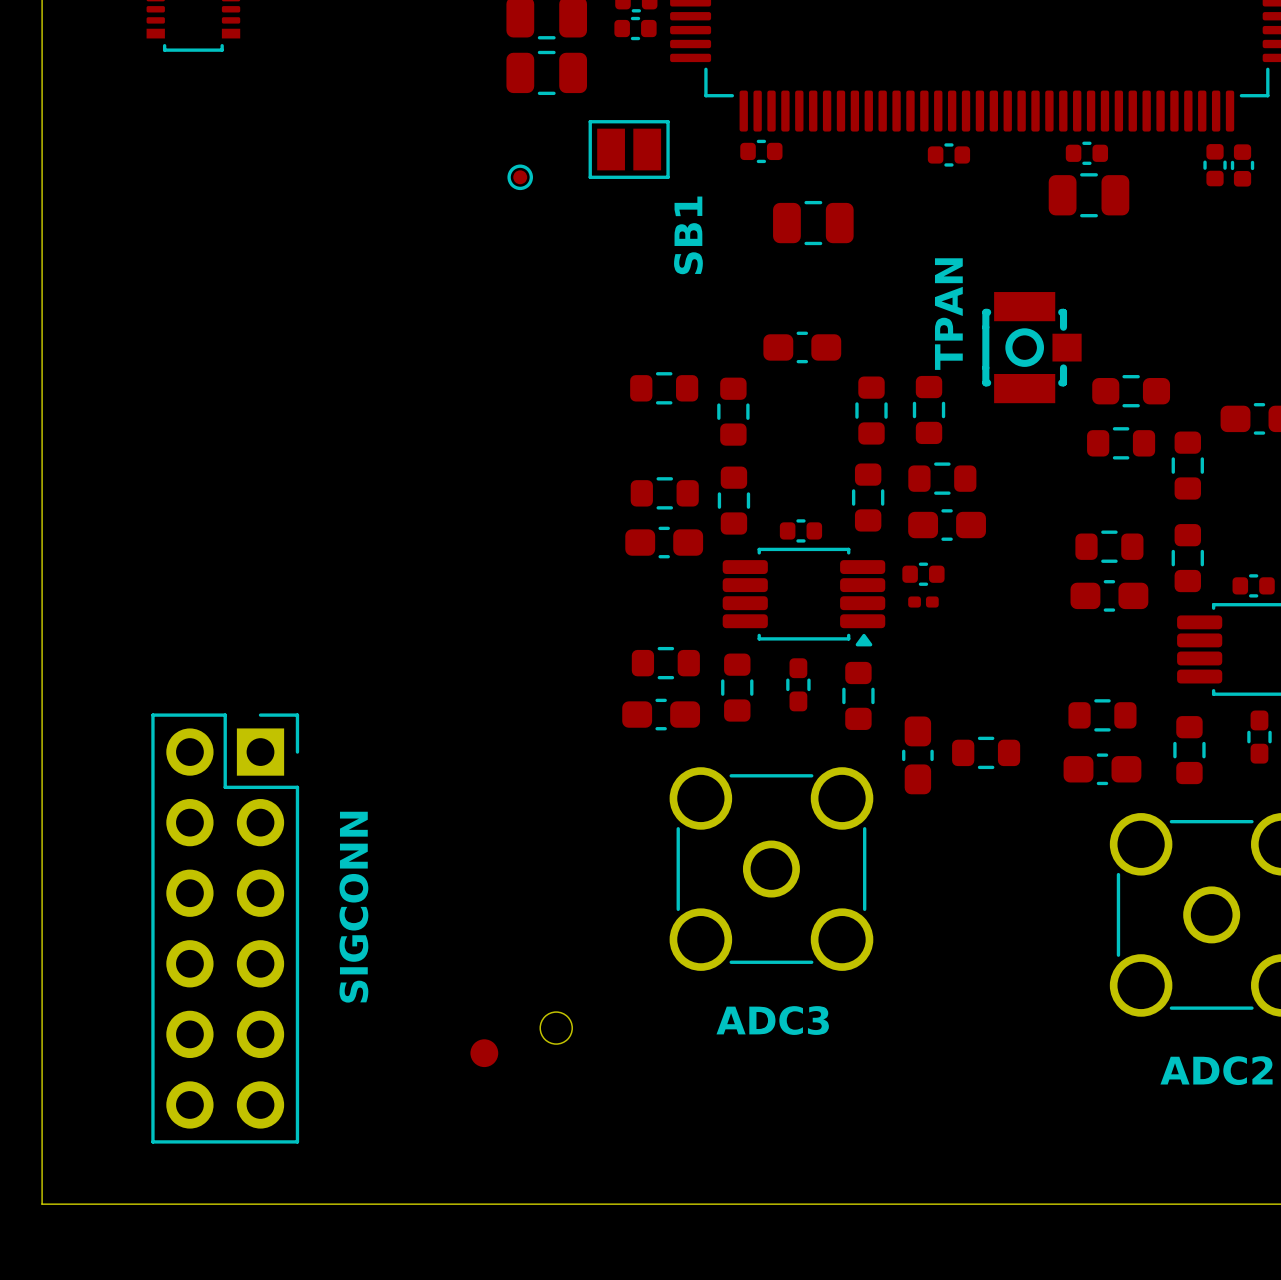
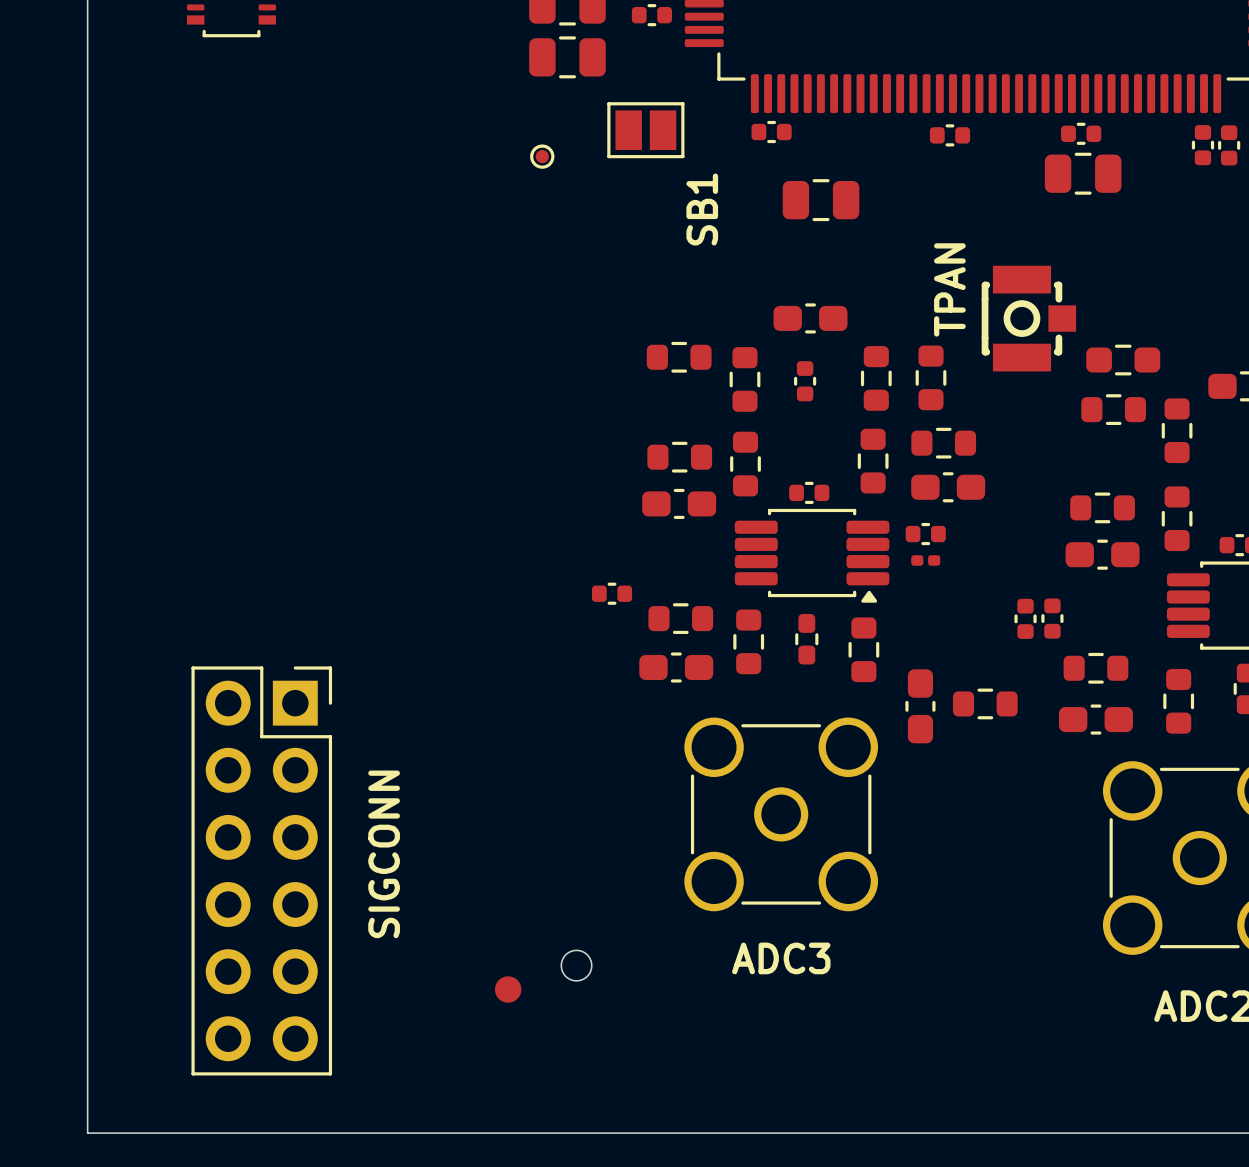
part: none -> (805, 381)
part: none -> (612, 593)
part: none -> (1025, 618)
part: none -> (1052, 618)

